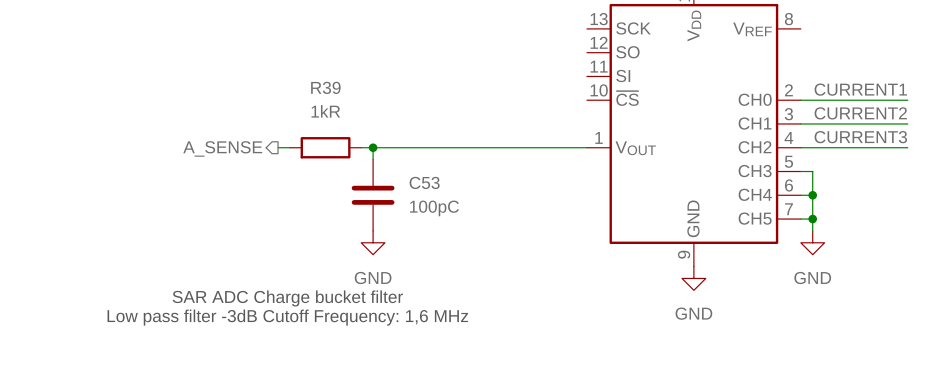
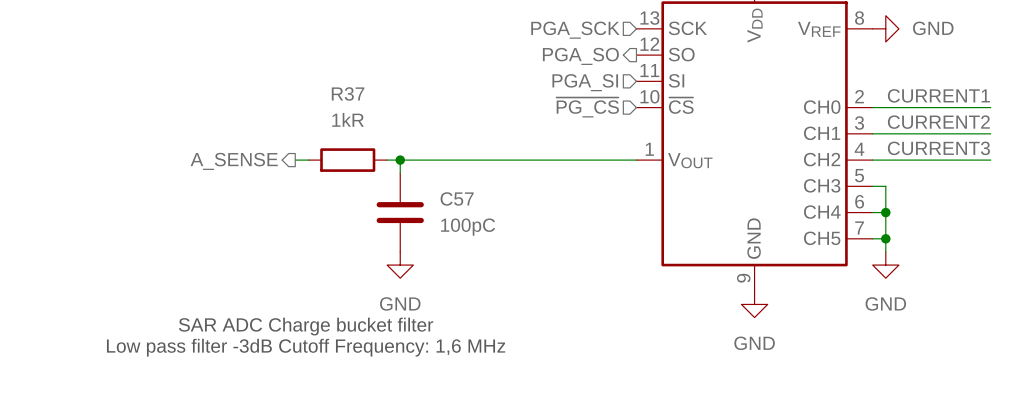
power symbol: none -> GND (885, 28)
hierarchical label: none -> PGA_SCK (575, 30)
hierarchical label: none -> PGA_SO (580, 56)
hierarchical label: none -> PGA_SI (585, 82)
R39 name: R39 (325, 87) -> R37 (348, 93)
hierarchical label: none -> ~{PG_CS} (587, 107)
C53 name: C53 (424, 182) -> C57 (457, 198)

